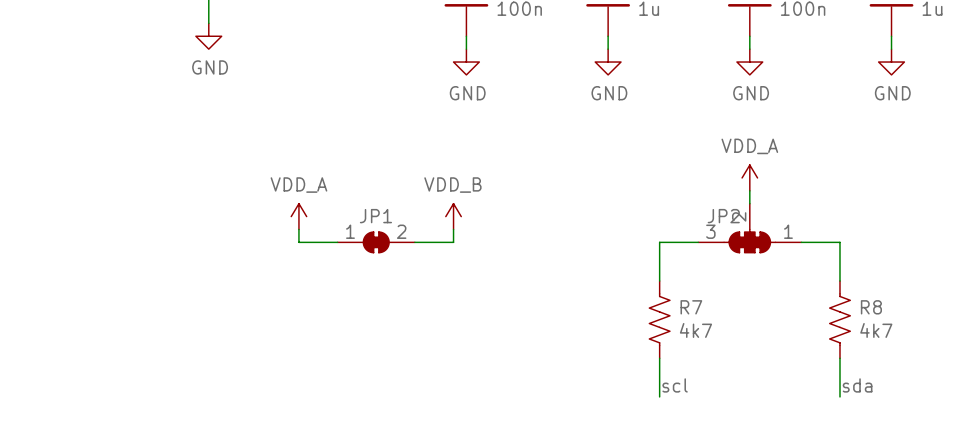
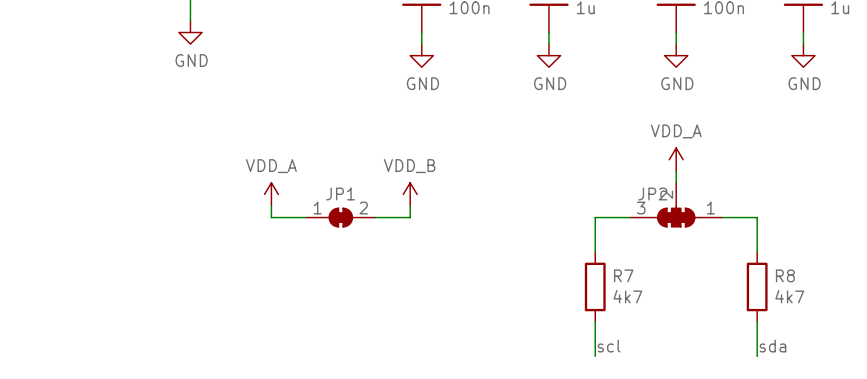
R7 symbol: [649, 281, 670, 359] -> [584, 252, 606, 322]
R8 symbol: [829, 281, 851, 359] -> [746, 252, 768, 322]

